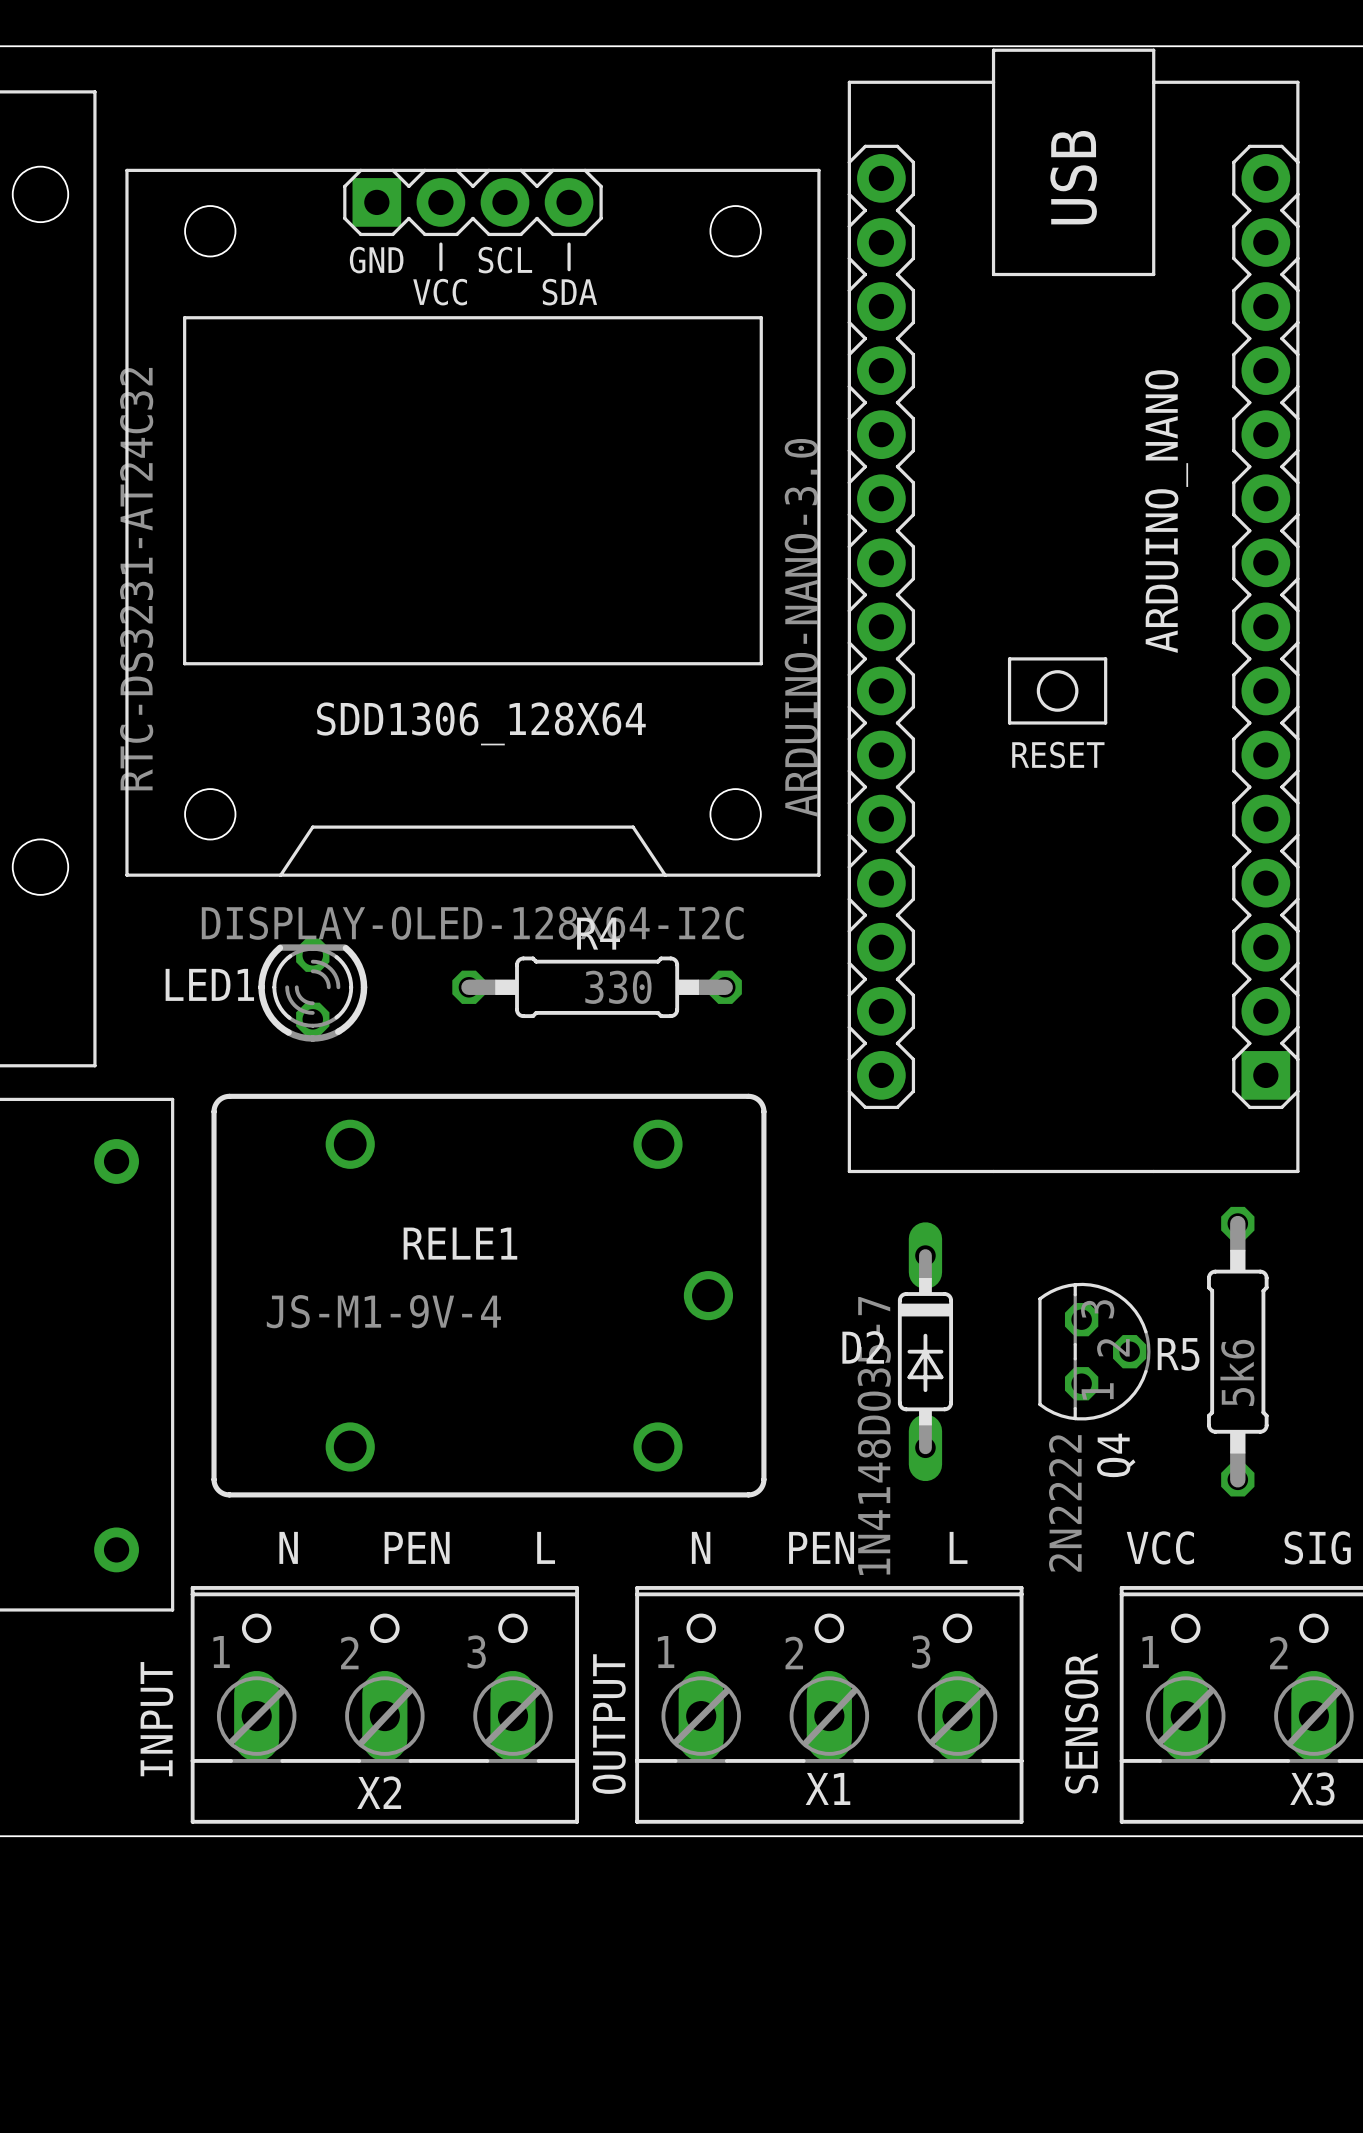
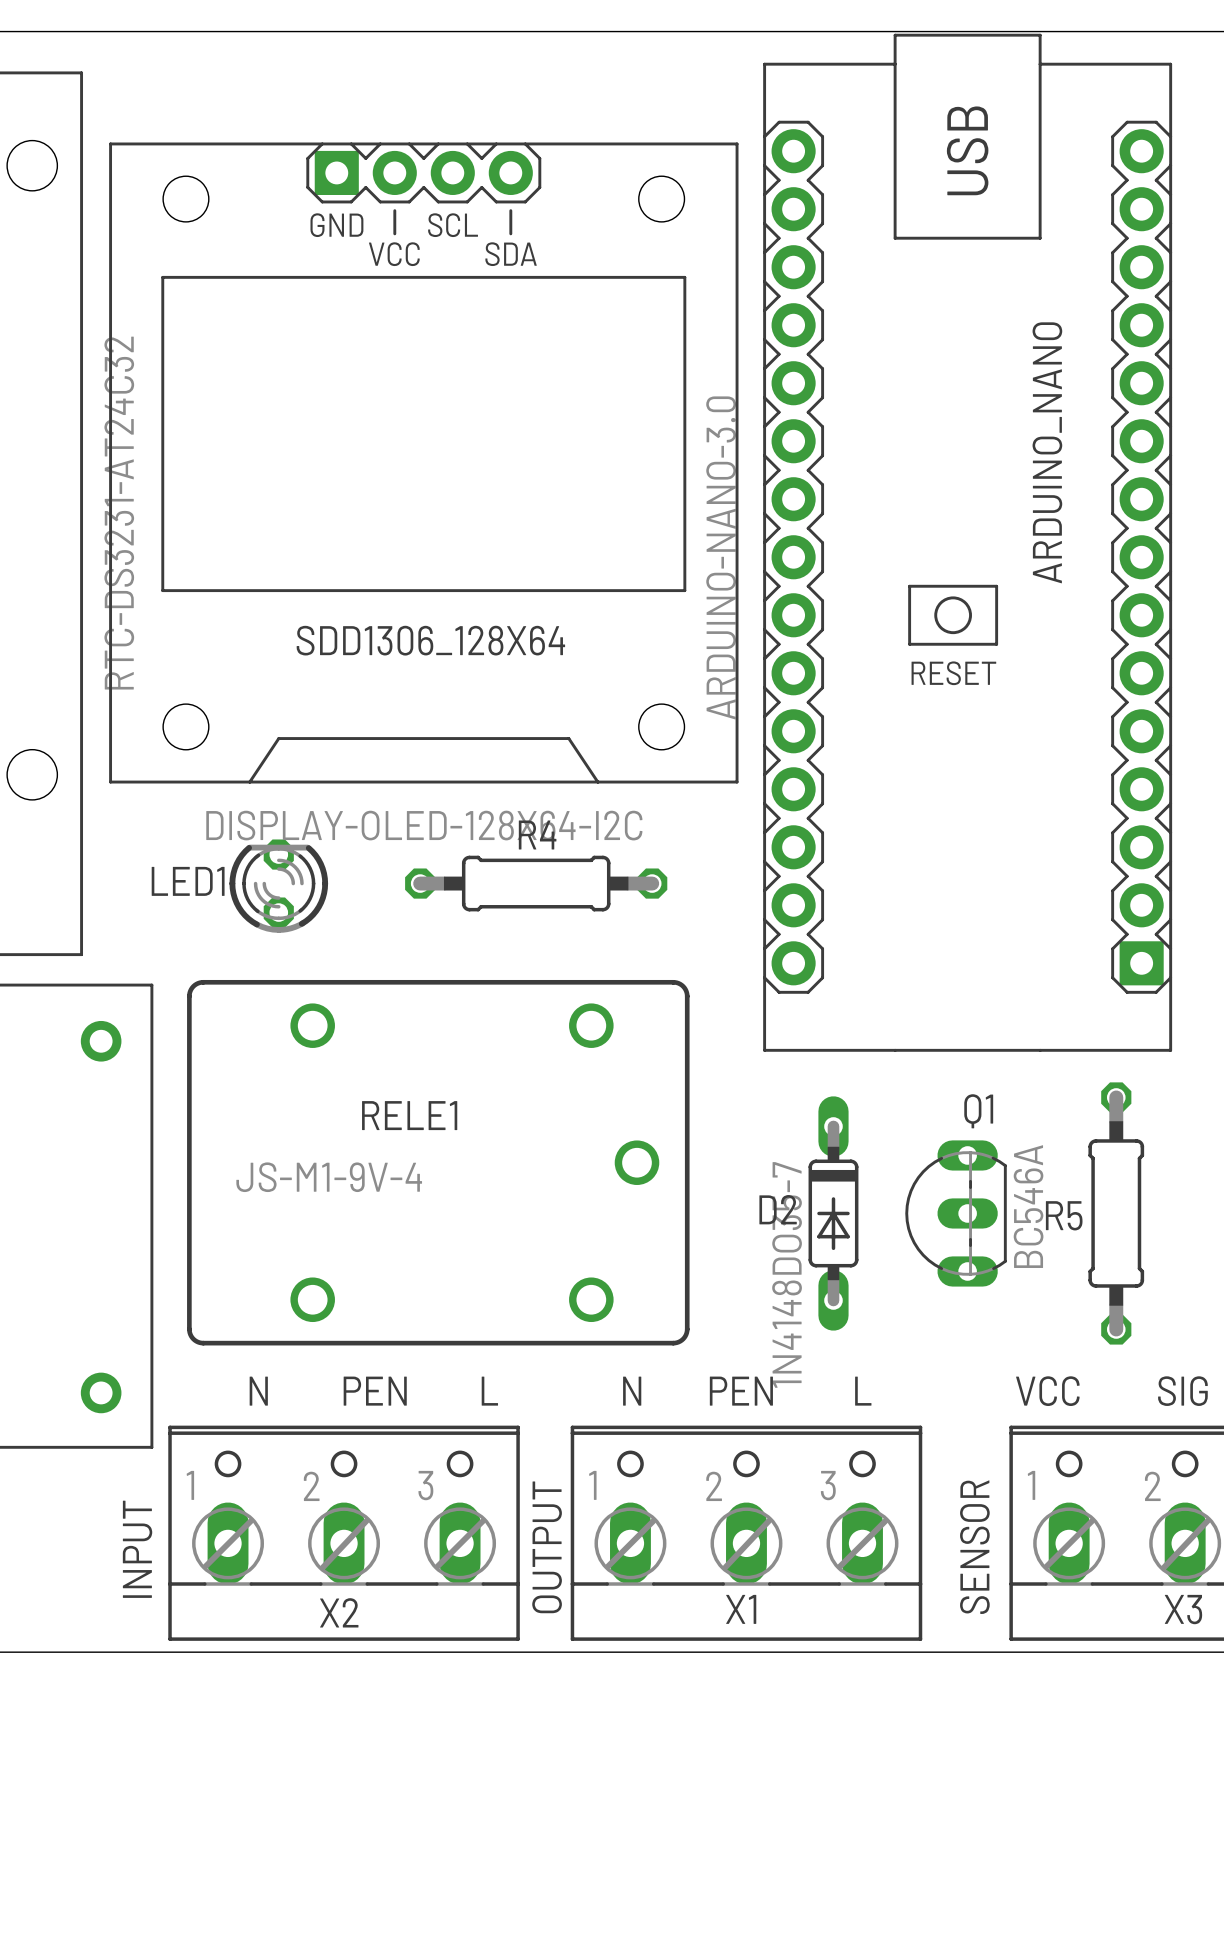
R4 value: 330 (618, 987) -> none
Q1: none -> BC546A (956, 1213)
Q4: 2N2222 (1094, 1351) -> none
R5 value: 5k6 (1237, 1372) -> none

